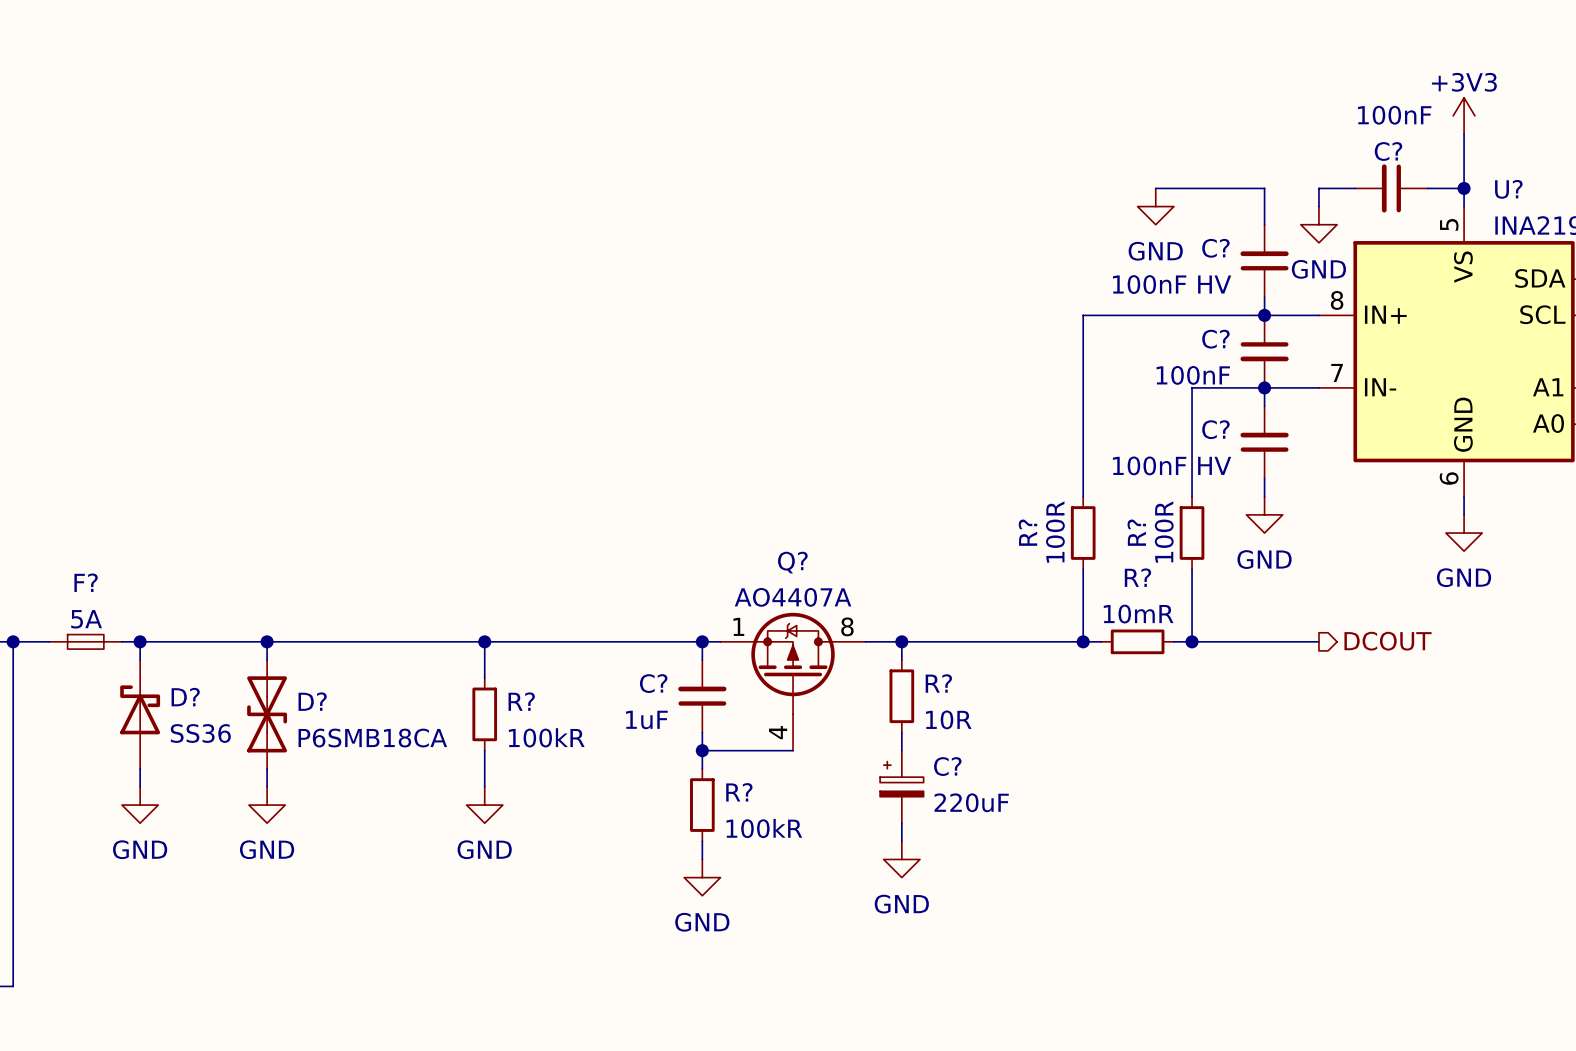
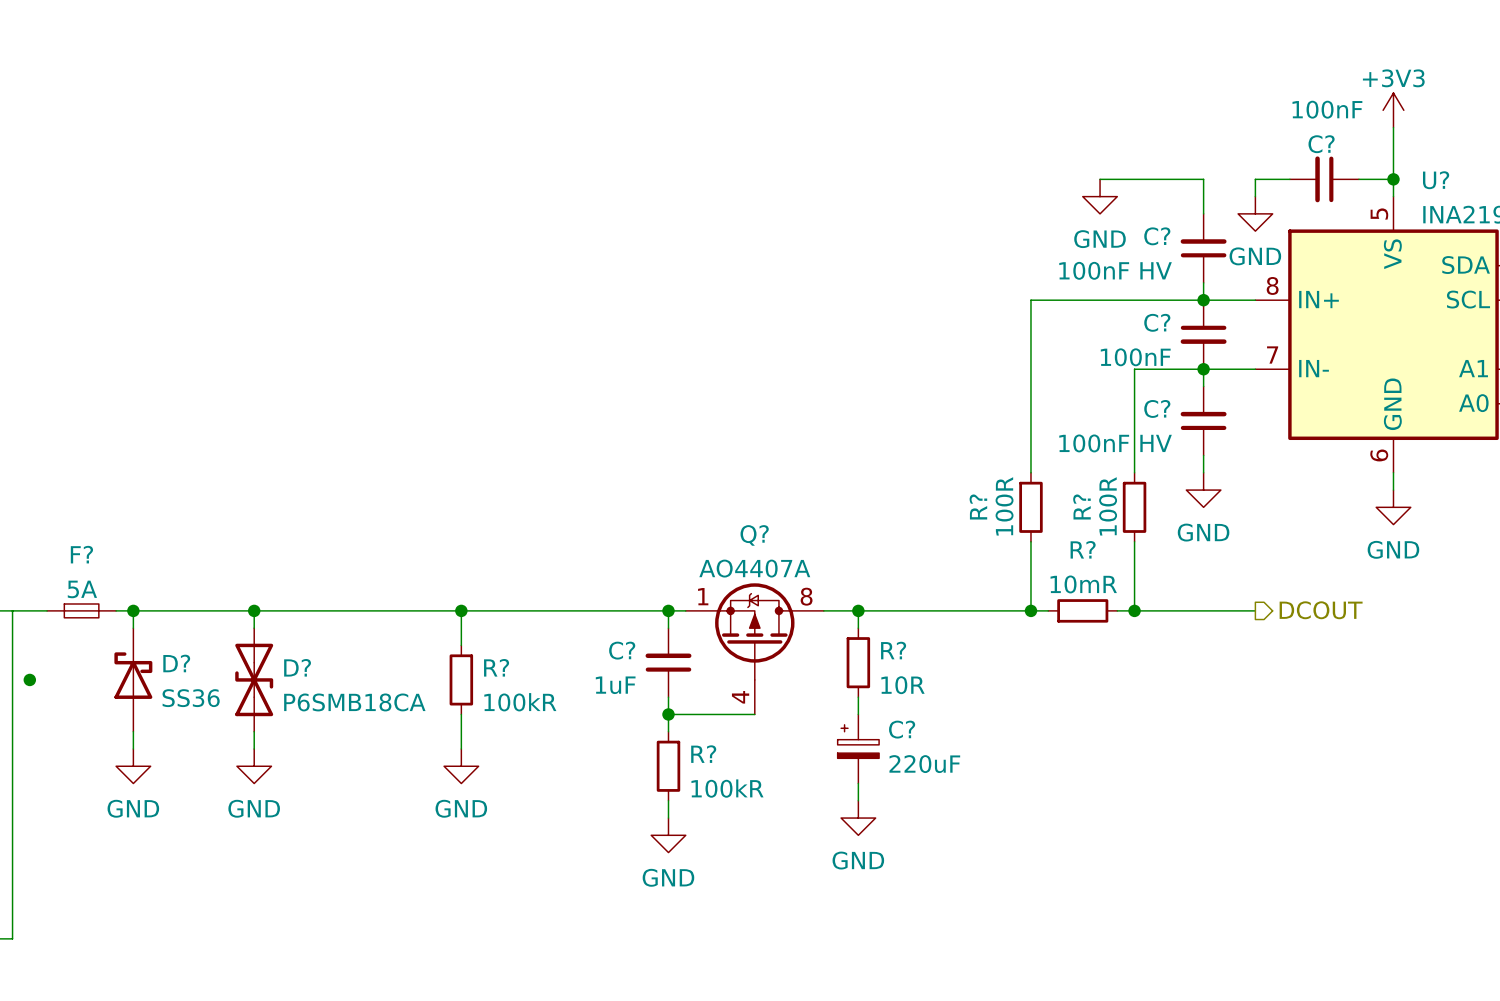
junction: (13, 641) -> none
junction: none -> (29, 679)

